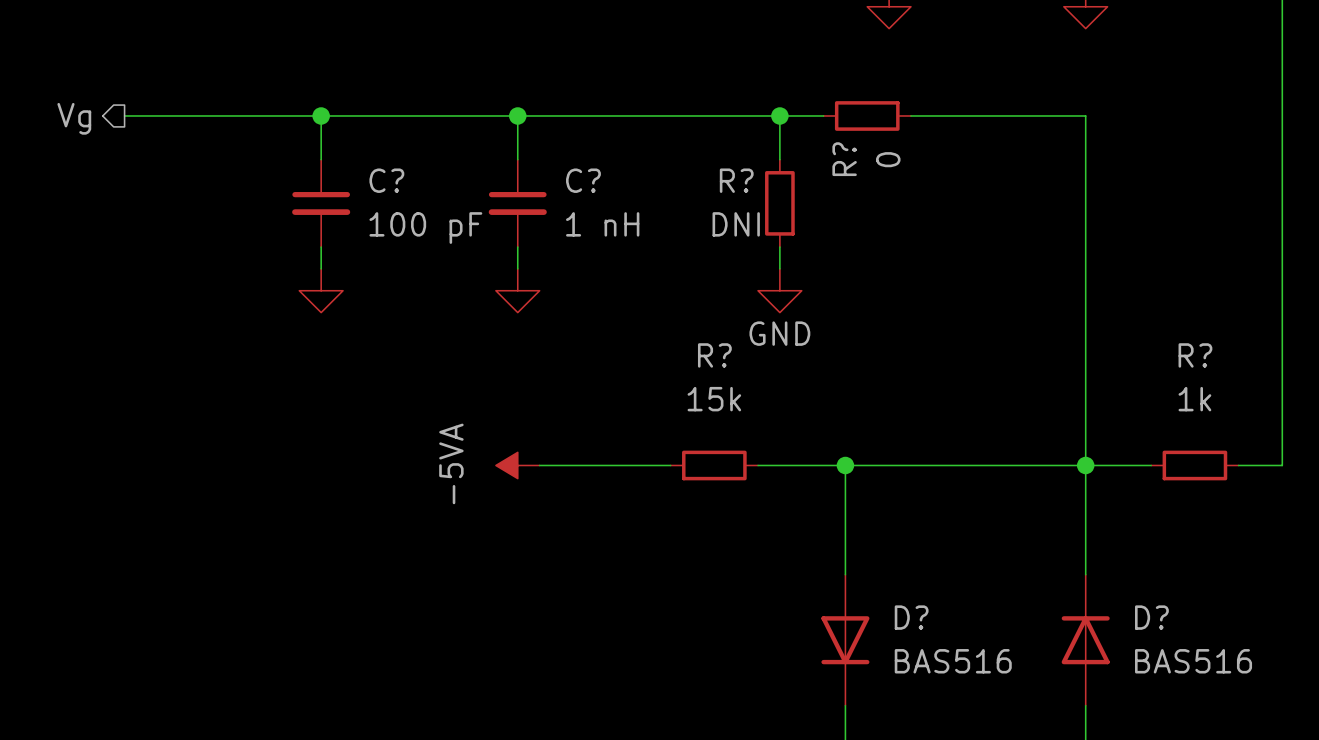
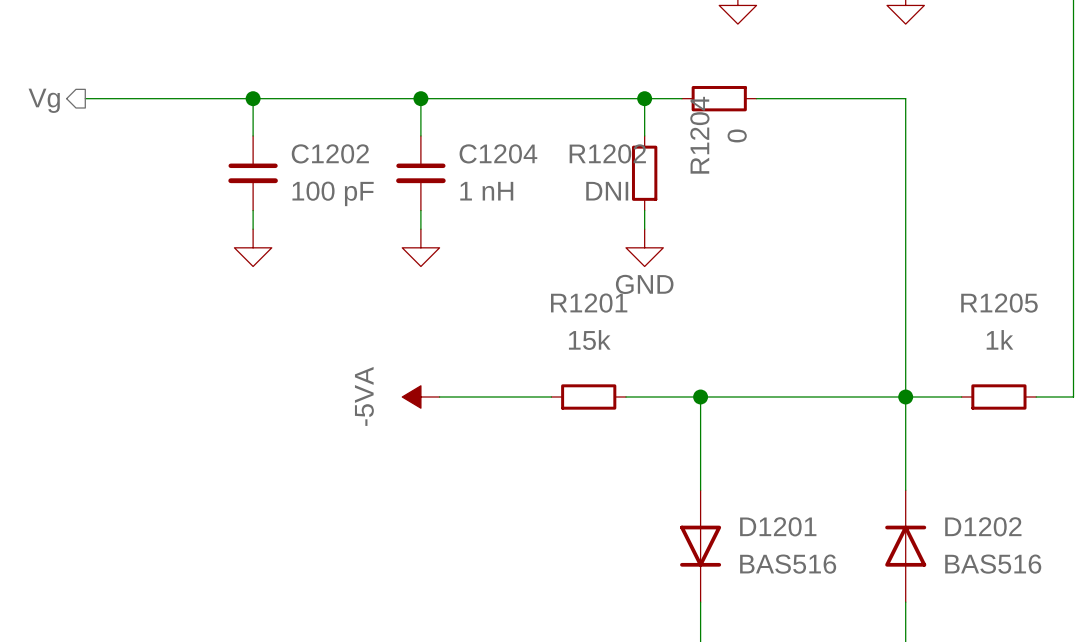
R? name: R? (844, 159) -> R1204 (699, 135)
C? name: C? (386, 180) -> C1202 (330, 153)
C? name: C? (583, 180) -> C1204 (498, 153)
R? name: R? (736, 180) -> R1202 (607, 153)
R? name: R? (714, 355) -> R1201 (589, 303)
R? name: R? (1195, 355) -> R1205 (999, 303)
D? name: D? (911, 617) -> D1201 (778, 526)
D? name: D? (1151, 617) -> D1202 (983, 526)

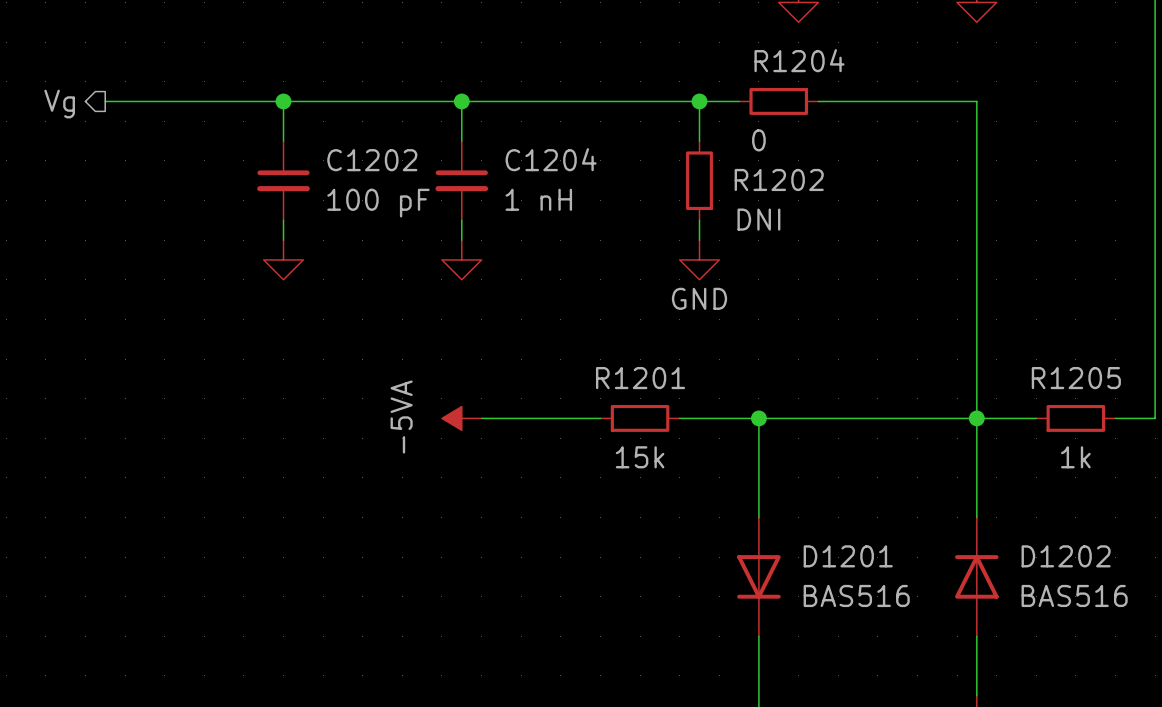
R1204 name rotation: 0° (699, 135) -> 90° clockwise (799, 60)
R1204 value rotation: 0° (737, 135) -> 90° clockwise (758, 140)
R1202 name position: R1202 (607, 153) -> R1202 (779, 179)
R1202 value position: DNI (607, 191) -> DNI (758, 219)
R1201 name position: R1201 (589, 303) -> R1201 (640, 378)
R1205 name position: R1205 (999, 303) -> R1205 (1076, 378)
R1205 value position: 1k (999, 339) -> 1k (1075, 457)
R1201 value position: 15k (589, 340) -> 15k (640, 457)

